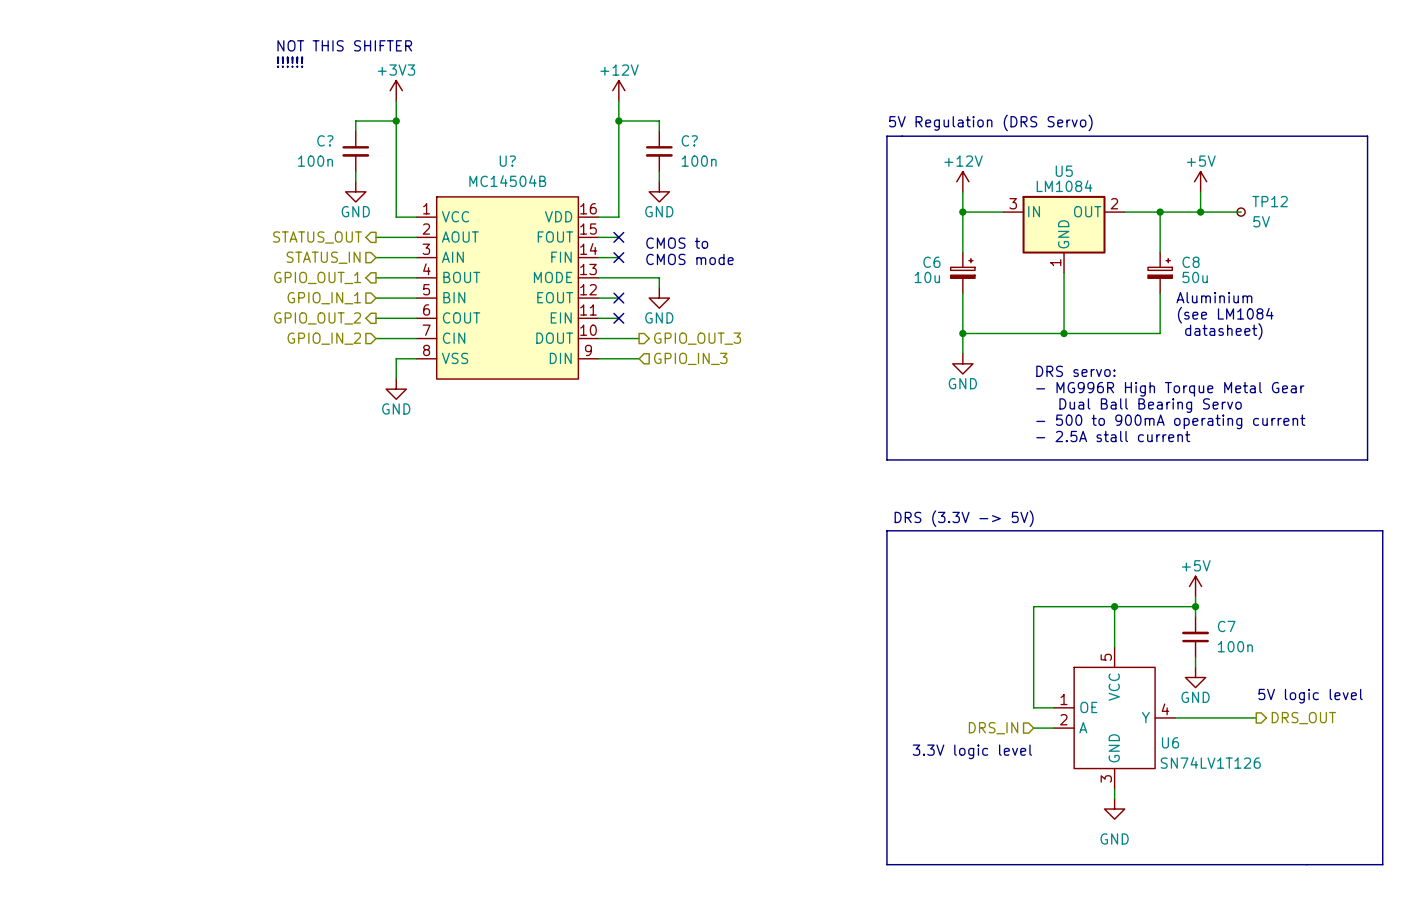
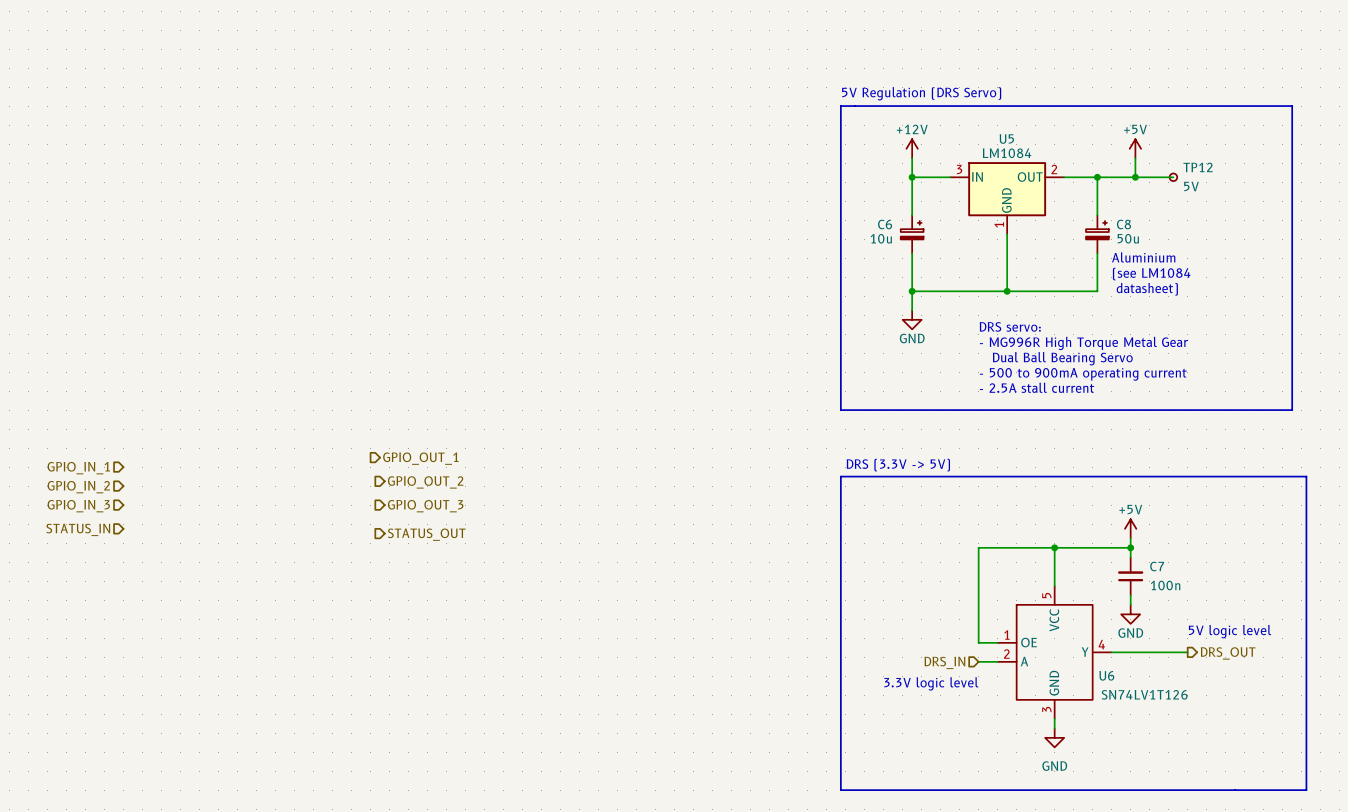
text: NOT THIS SHIFTER (344, 45) -> none
text: !!!!!! (290, 62) -> none
power symbol: +3V3 (396, 90) -> none
power symbol: +12V (618, 90) -> none
wire: (396, 100) (396, 217) (416, 217) -> none
wire: (618, 100) (618, 217) (598, 217) -> none
wire: (396, 121) (355, 121) (355, 131) -> none
junction: (396, 121) -> none
wire: (618, 121) (659, 121) (659, 131) -> none
junction: (618, 121) -> none
C?: 100n (355, 151) -> none
C?: 100n (659, 151) -> none
wire: (355, 171) (355, 181) -> none
wire: (659, 171) (659, 181) -> none
power symbol: GND (355, 191) -> none
power symbol: GND (659, 191) -> none
hierarchical label: STATUS_OUT (317, 237) -> none
wire: (376, 237) (416, 237) -> none
wire: (598, 237) (618, 237) -> none
no-connect mark: (618, 237) -> none
text: CMOS to (677, 243) -> none
hierarchical label: STATUS_IN (323, 257) -> none
wire: (376, 257) (416, 257) -> none
wire: (598, 257) (618, 257) -> none
no-connect mark: (618, 257) -> none
text: CMOS mode (689, 259) -> none
hierarchical label: GPIO_OUT_1 (317, 277) -> none
wire: (376, 277) (416, 277) -> none
wire: (598, 277) (659, 277) (659, 287) -> none
U?: MC14504B (507, 287) -> none
hierarchical label: GPIO_IN_1 (324, 298) -> none
wire: (376, 298) (416, 298) -> none
wire: (598, 298) (618, 298) -> none
no-connect mark: (618, 298) -> none
power symbol: GND (659, 298) -> none
hierarchical label: GPIO_OUT_2 (317, 318) -> none
wire: (376, 318) (416, 318) -> none
wire: (598, 318) (618, 318) -> none
no-connect mark: (618, 318) -> none
hierarchical label: GPIO_IN_2 (324, 338) -> none
wire: (376, 338) (416, 338) -> none
wire: (598, 338) (639, 338) -> none
hierarchical label: GPIO_OUT_3 (697, 338) -> none
wire: (416, 358) (396, 358) (396, 379) -> none
wire: (598, 358) (639, 358) -> none
hierarchical label: GPIO_IN_3 (690, 358) -> none
power symbol: GND (396, 389) -> none
hierarchical label: none -> GPIO_OUT_1 (420, 458)
hierarchical label: none -> GPIO_IN_1 (78, 468)
hierarchical label: none -> GPIO_OUT_2 (425, 482)
hierarchical label: none -> GPIO_IN_2 (78, 487)
hierarchical label: none -> GPIO_IN_3 (78, 506)
hierarchical label: none -> GPIO_OUT_3 (425, 506)
hierarchical label: none -> STATUS_IN (78, 529)
hierarchical label: none -> STATUS_OUT (426, 534)

